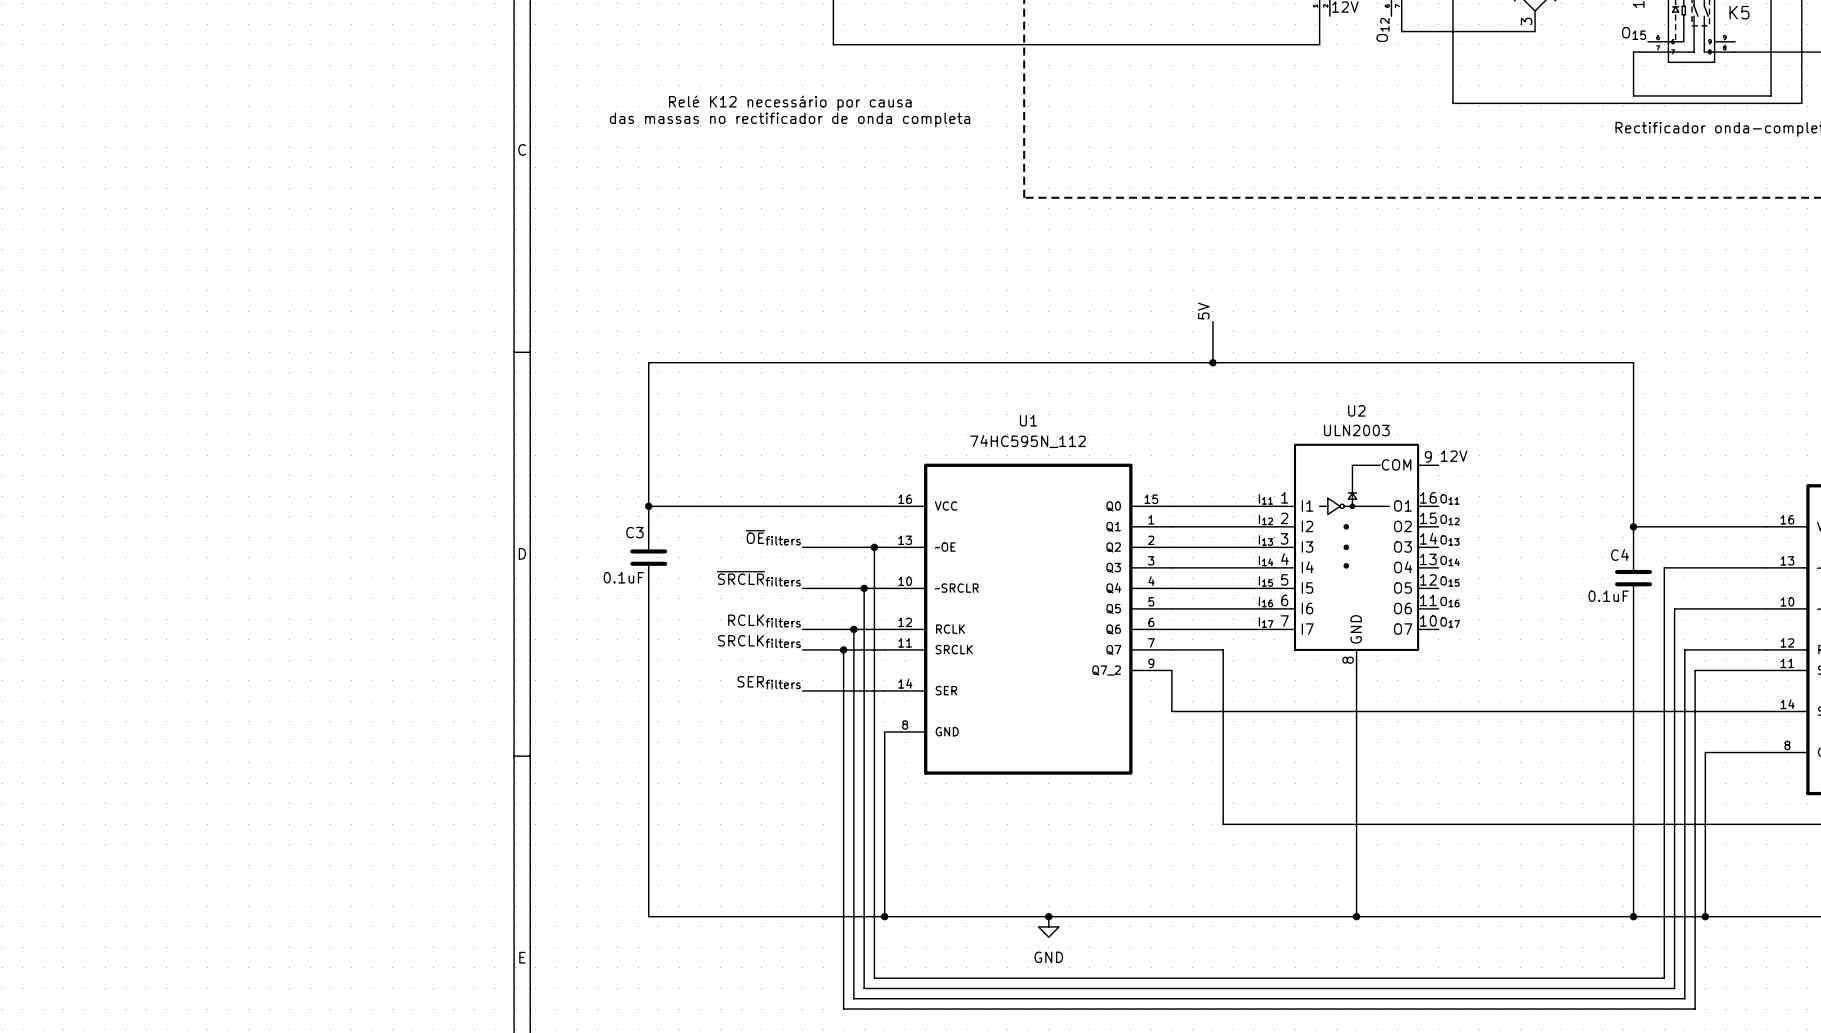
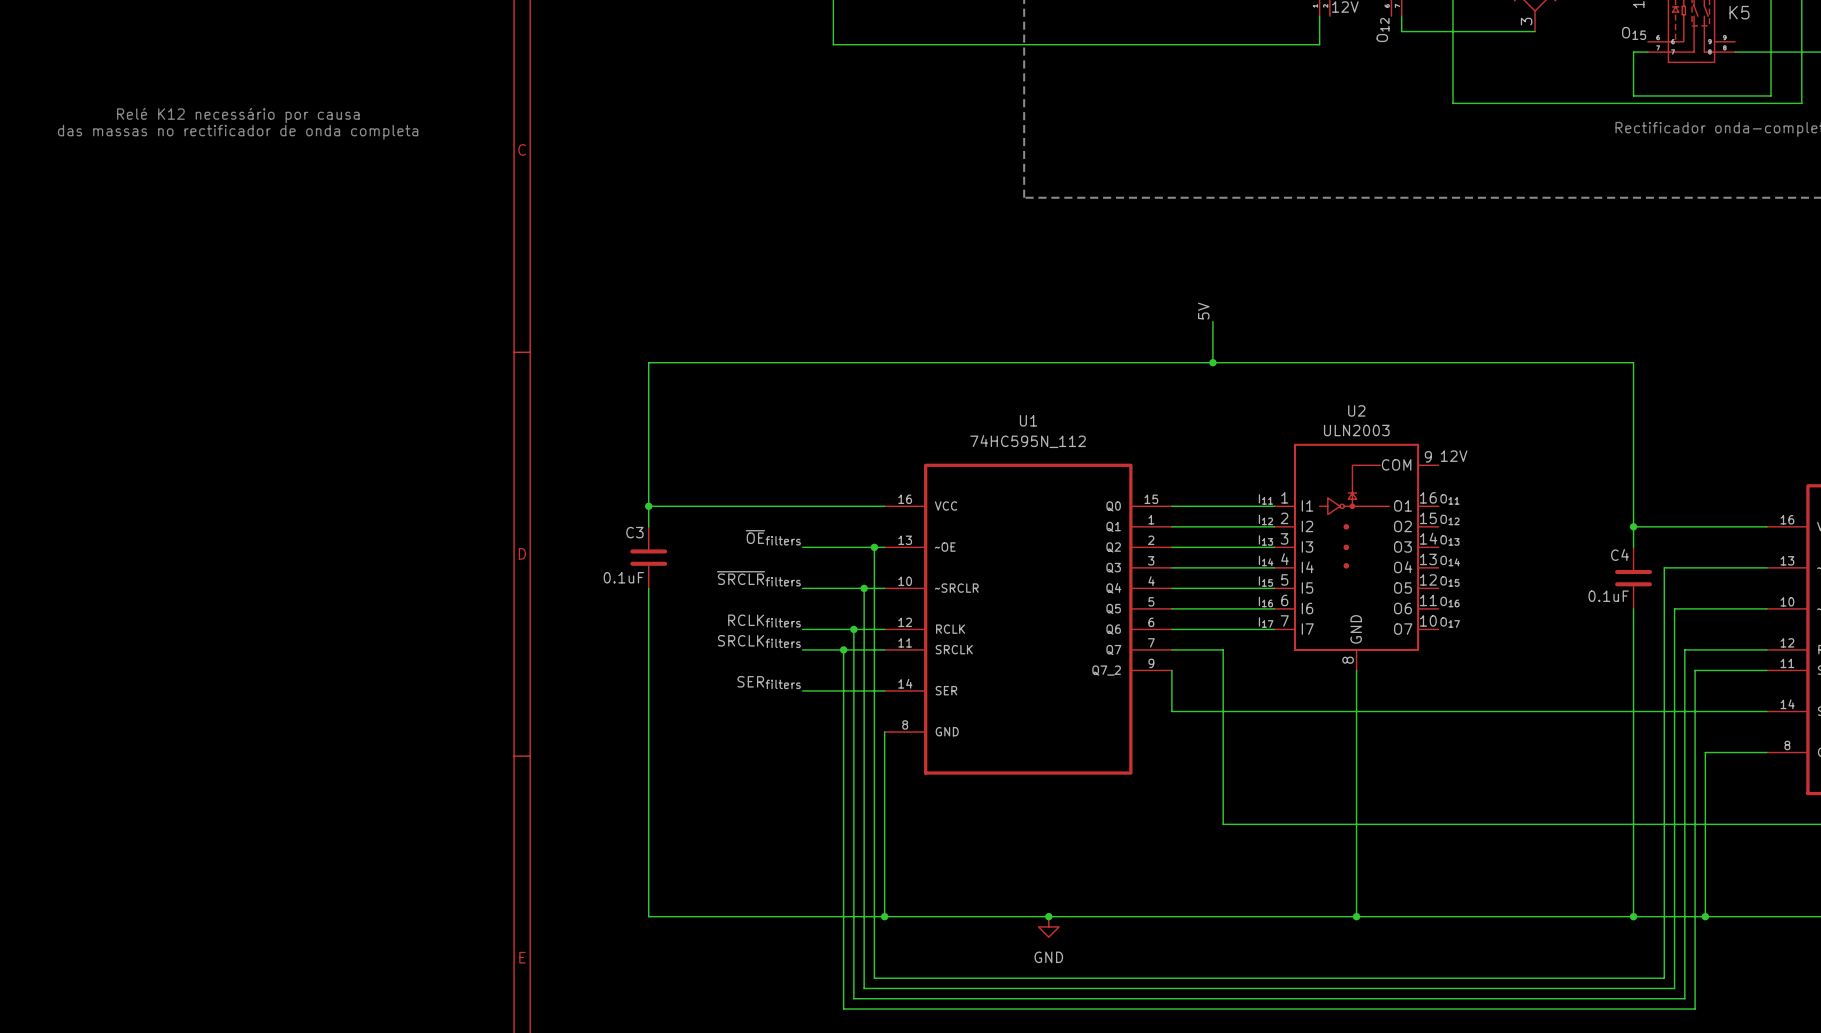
text: Relé K12 necessário por causa (790, 103) -> none
text: none -> Relé K12 necessário por causa (238, 115)
text: das massas no rectificador de onda completa (790, 119) -> none
text: none -> das massas no rectificador de onda completa (238, 132)

